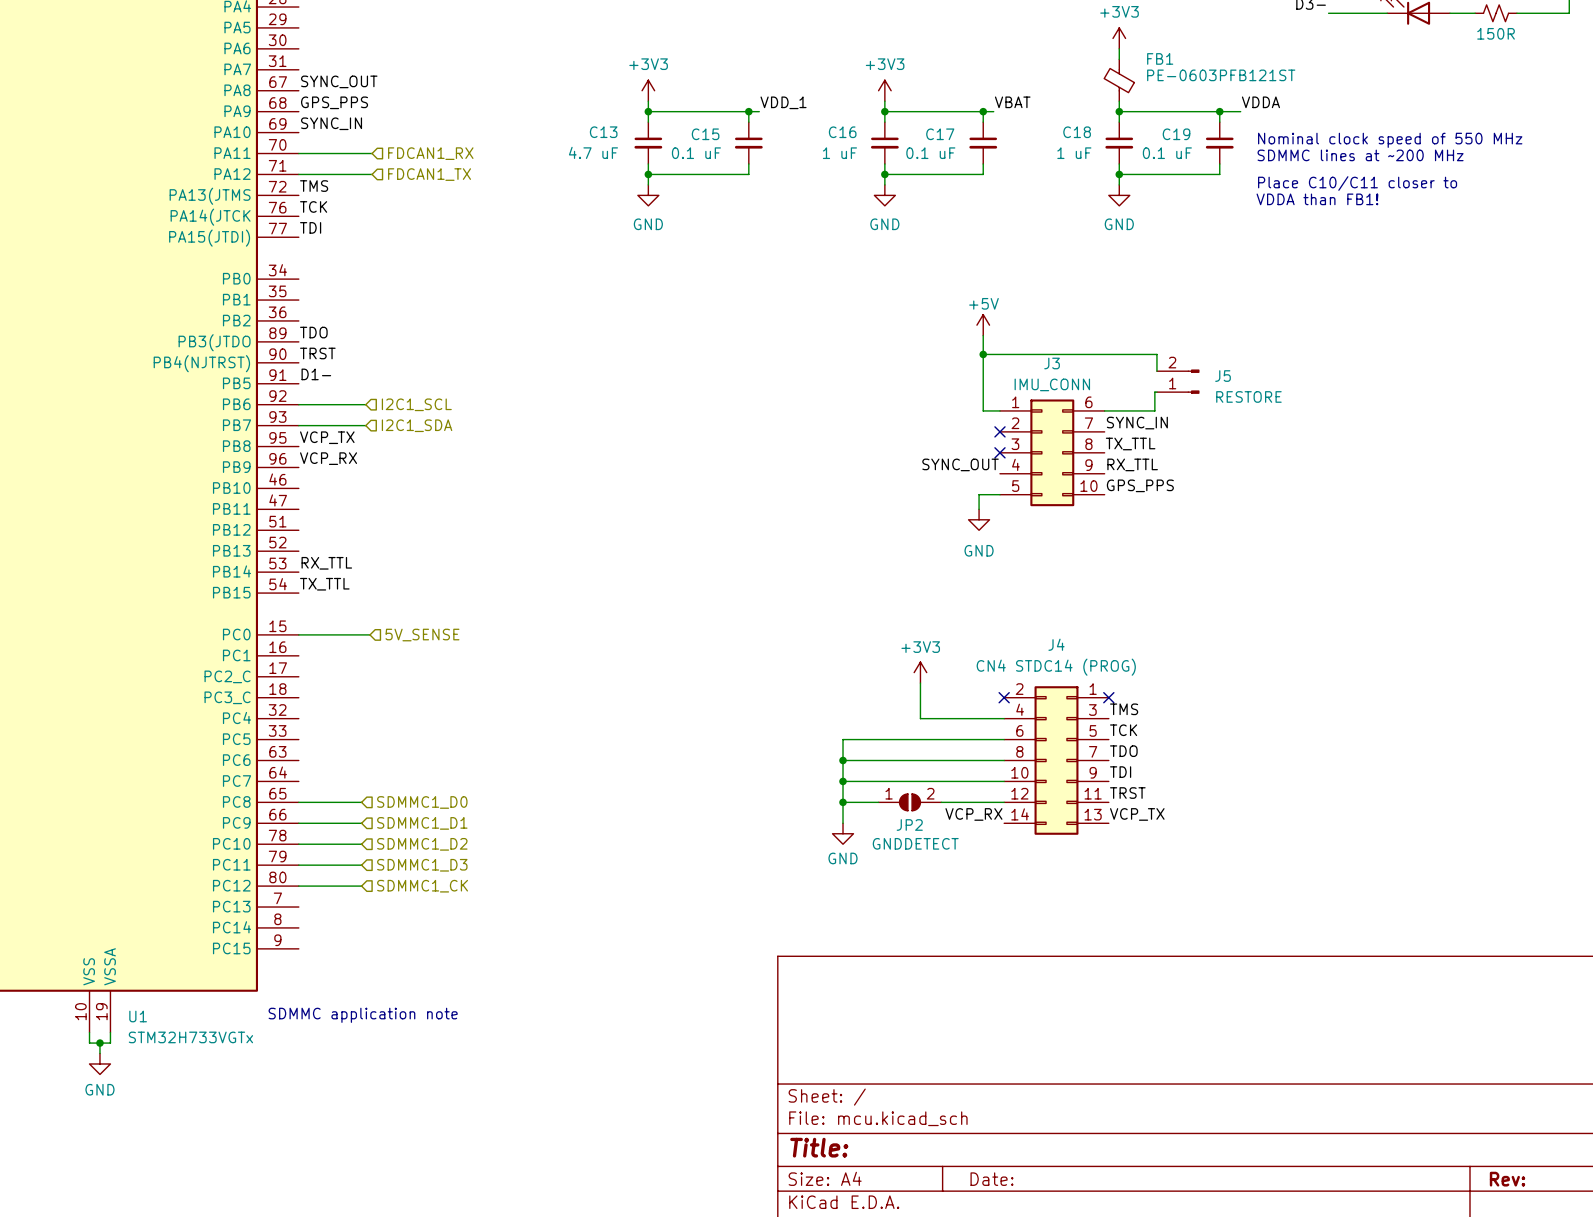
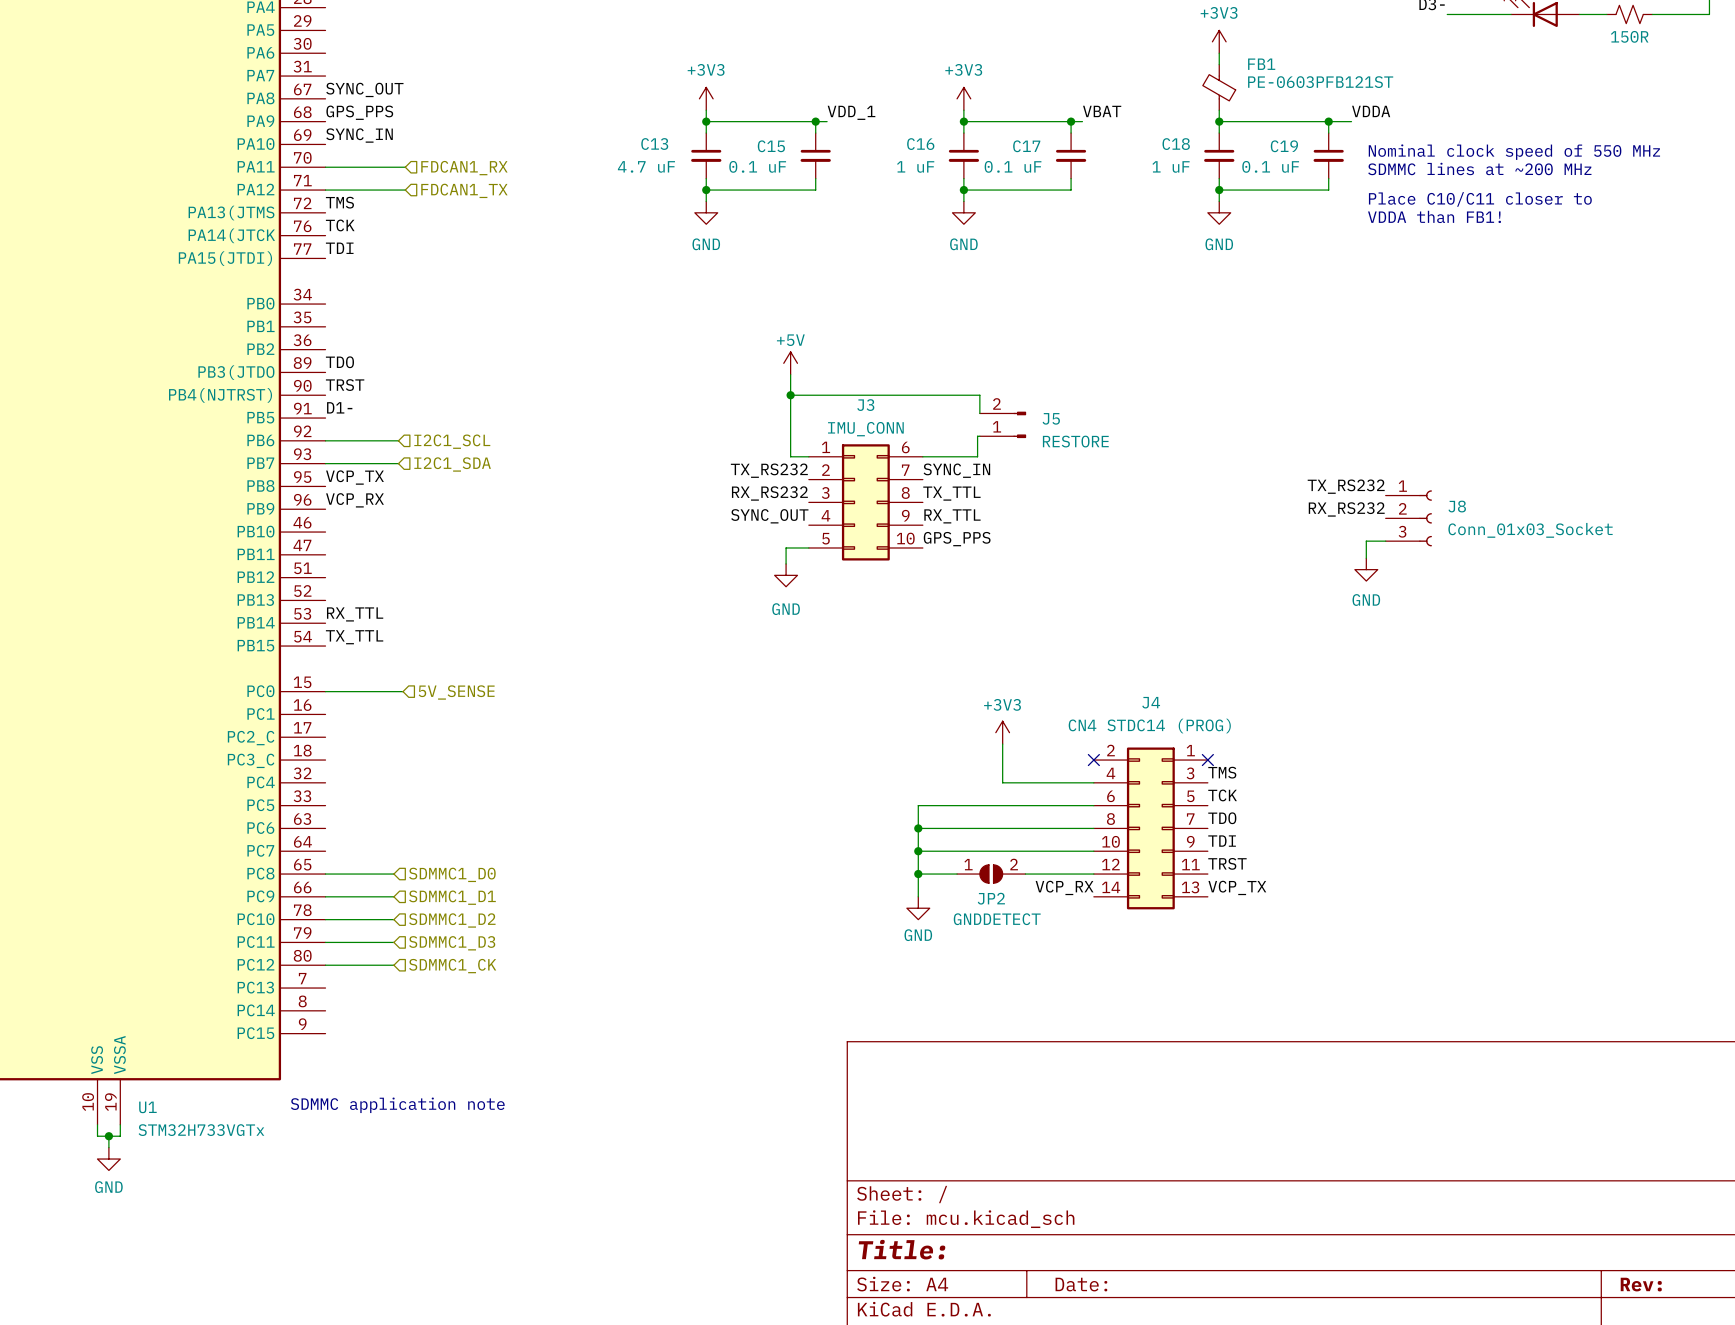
power symbol: +5V (983, 325) -> none
power symbol: none -> +5V (790, 363)
wire: (983, 335) (983, 410) (999, 410) -> none
wire: none -> (790, 374) (790, 456) (808, 456)
wire: (983, 354) (1156, 354) (1156, 371) -> none
junction: (983, 354) -> none
wire: none -> (790, 395) (979, 395) (979, 413)
junction: none -> (790, 395)
J5 position: (1178, 381) -> (1003, 424)
wire: (1156, 392) (1154, 392) (1154, 410) (1104, 410) -> none
wire: none -> (979, 436) (977, 436) (977, 456) (922, 456)
label: SYNC_IN (1137, 423) -> none
label: none -> TX_RS232 (769, 470)
label: none -> SYNC_IN (956, 470)
no-connect mark: (999, 431) -> none
label: TX_TTL (1130, 443) -> none
label: none -> TX_RS232 (1346, 486)
label: none -> RX_RS232 (769, 493)
label: none -> TX_TTL (951, 493)
no-connect mark: (999, 452) -> none
J3 position: (1052, 452) -> (865, 502)
label: SYNC_OUT (960, 464) -> none
label: RX_TTL (1132, 464) -> none
label: none -> RX_RS232 (1346, 509)
label: none -> SYNC_OUT (769, 516)
label: none -> RX_TTL (952, 516)
J8: none -> Conn_01x03_Socket (1408, 518)
label: GPS_PPS (1140, 485) -> none
label: none -> GPS_PPS (957, 539)
wire: (999, 494) (979, 494) (979, 509) -> none
wire: none -> (1385, 541) (1366, 541) (1366, 558)
wire: none -> (808, 547) (786, 547) (786, 563)
power symbol: GND (979, 519) -> none
power symbol: none -> GND (1366, 569)
power symbol: none -> GND (786, 575)

